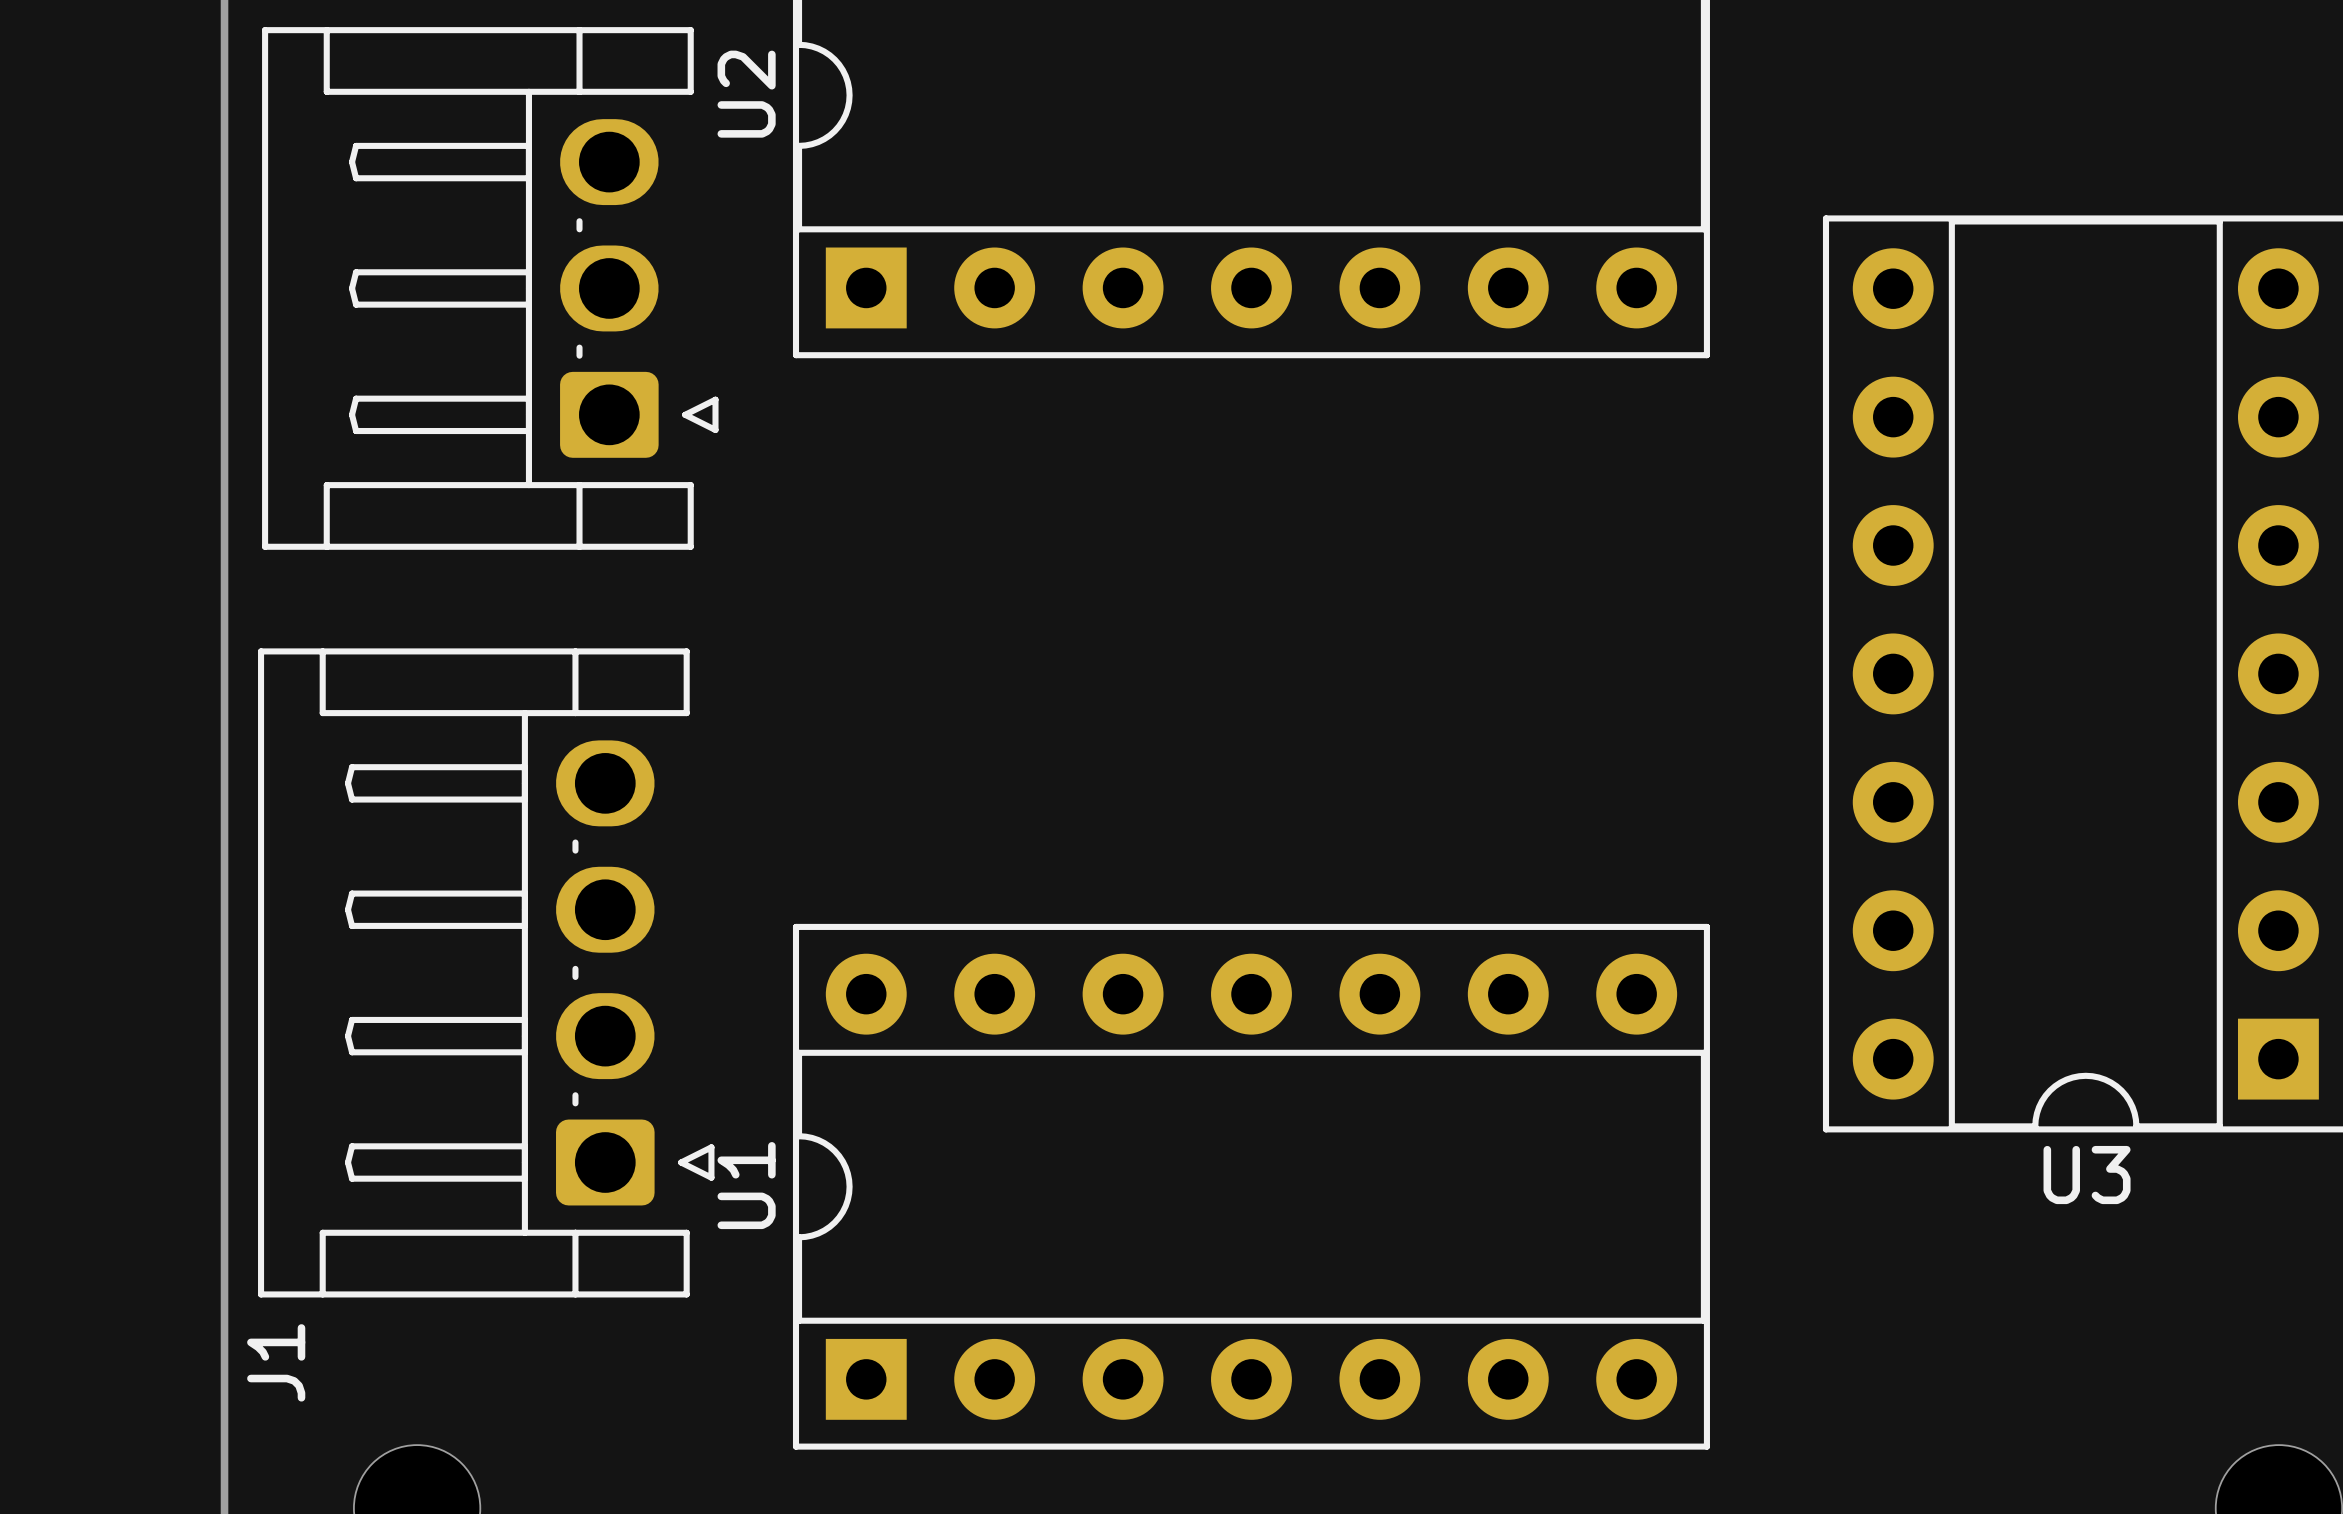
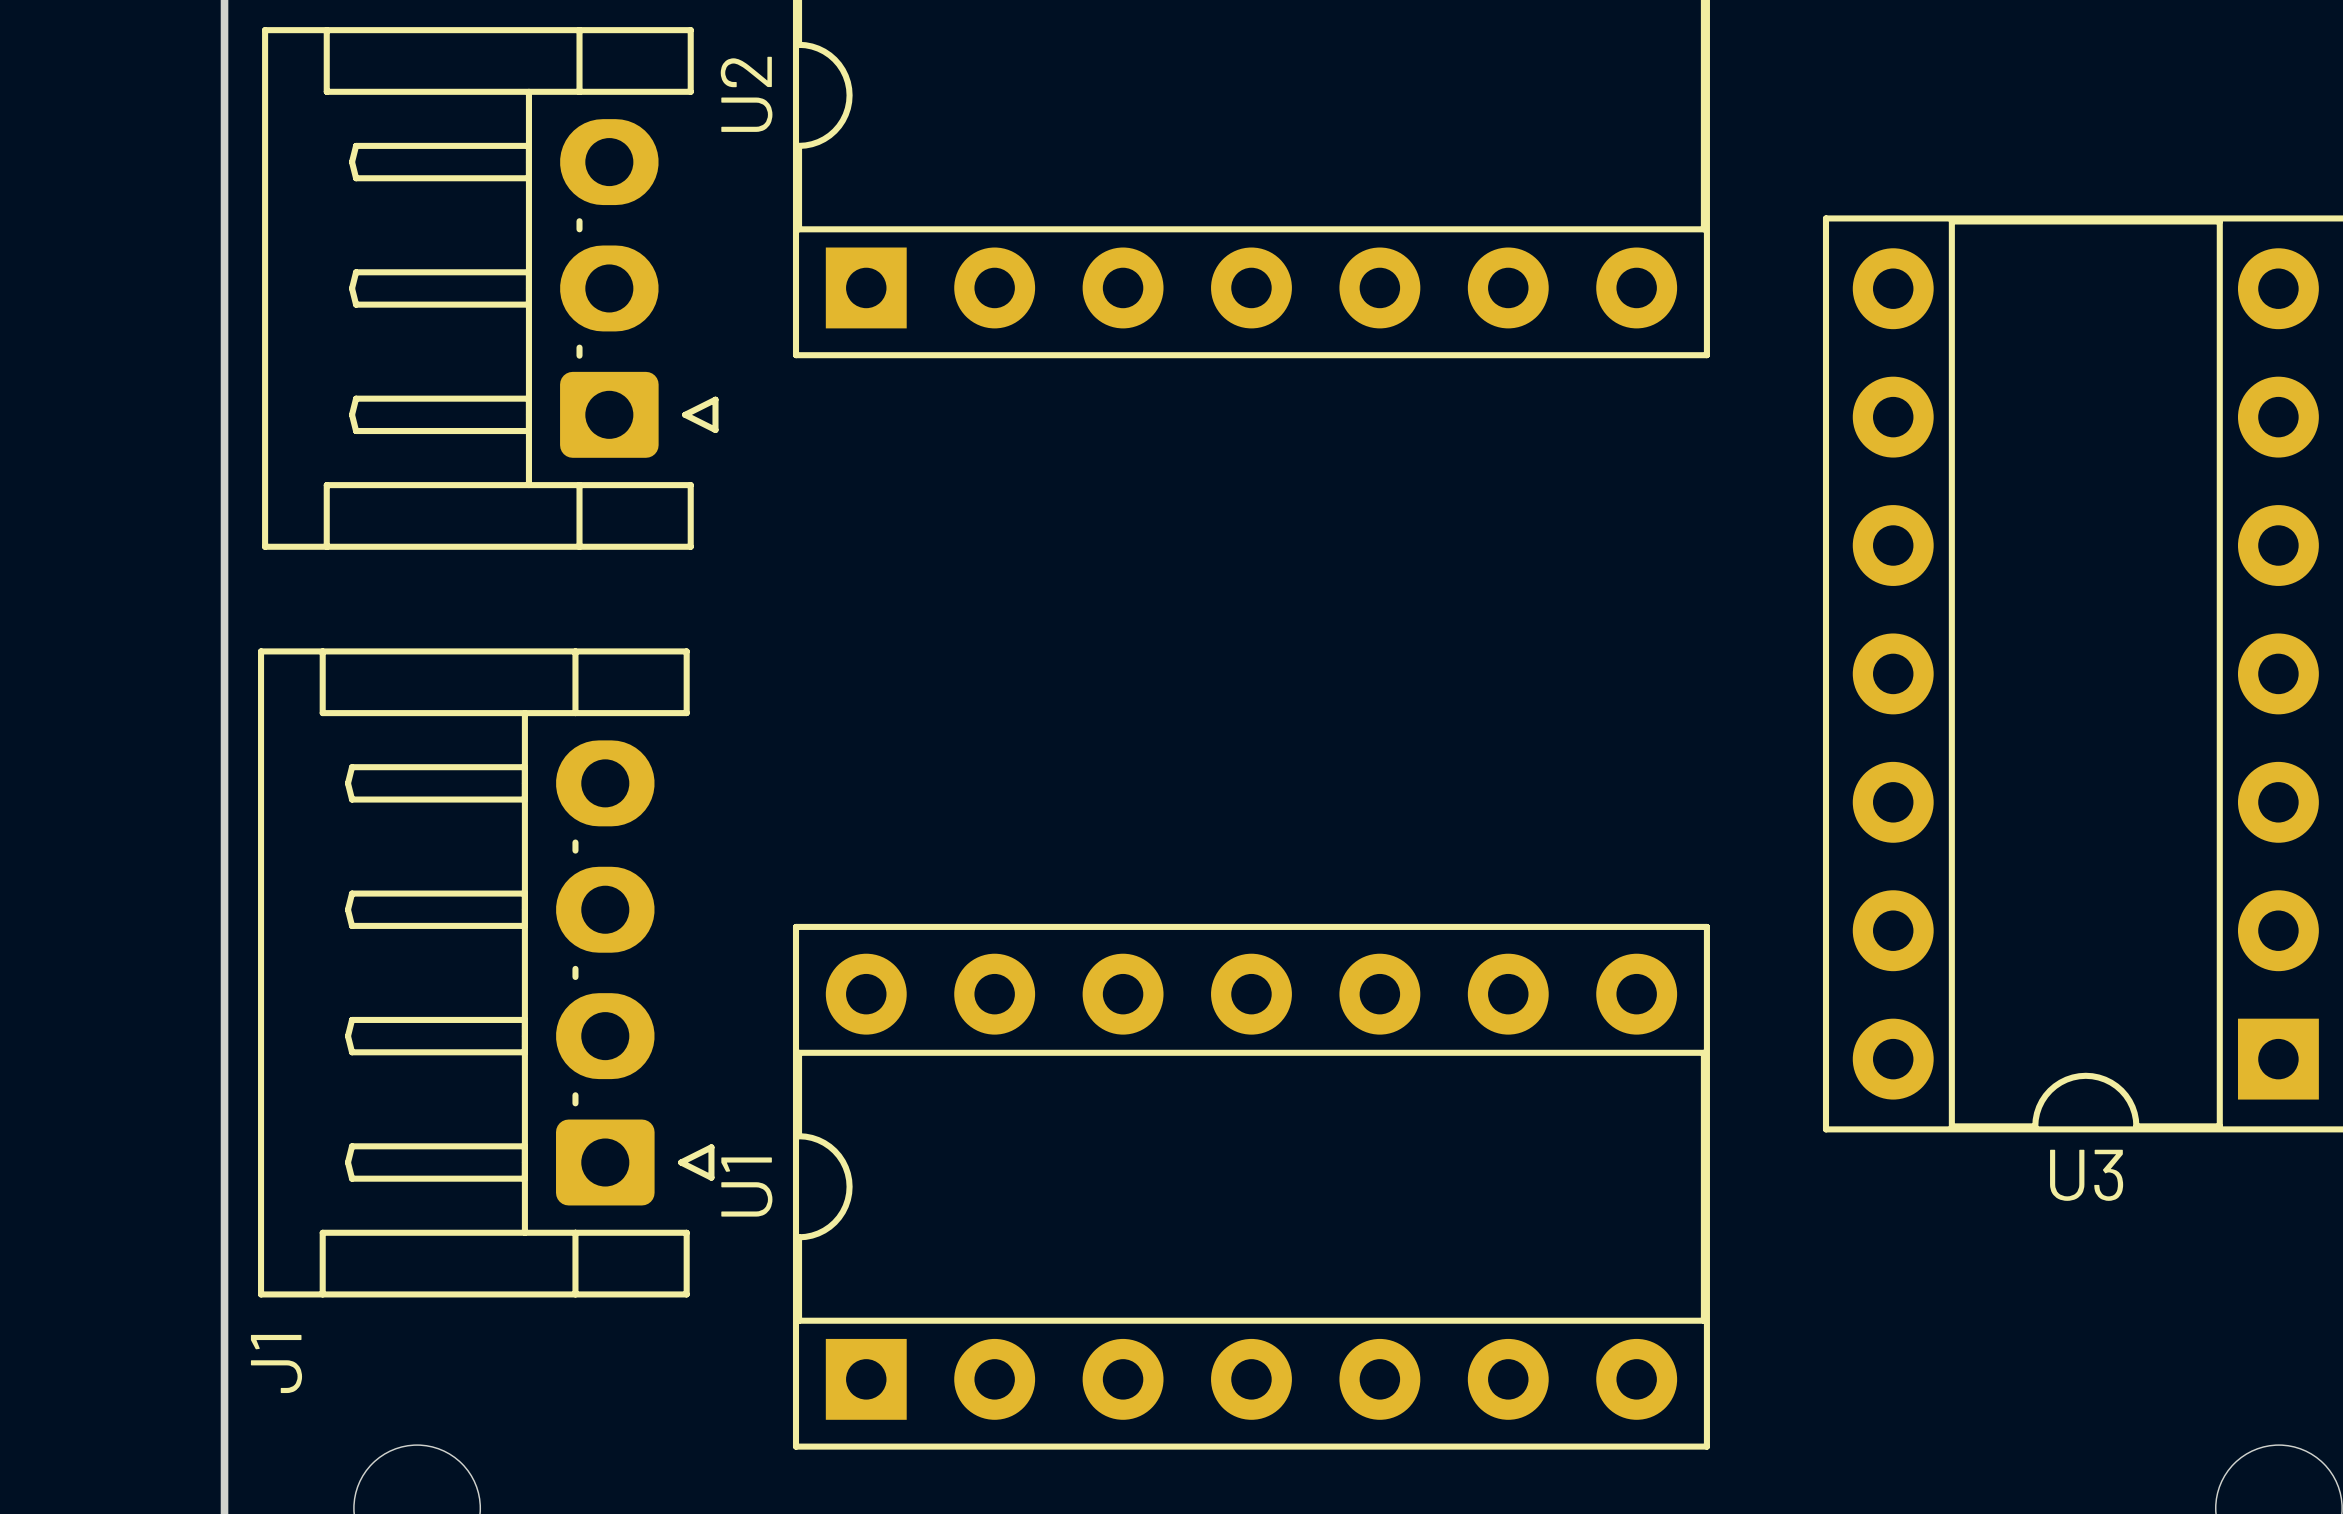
part footprint: [262, 27, 719, 550] -> [262, 27, 719, 550]
J1 footprint: [258, 648, 715, 1298] -> [258, 648, 715, 1298]

